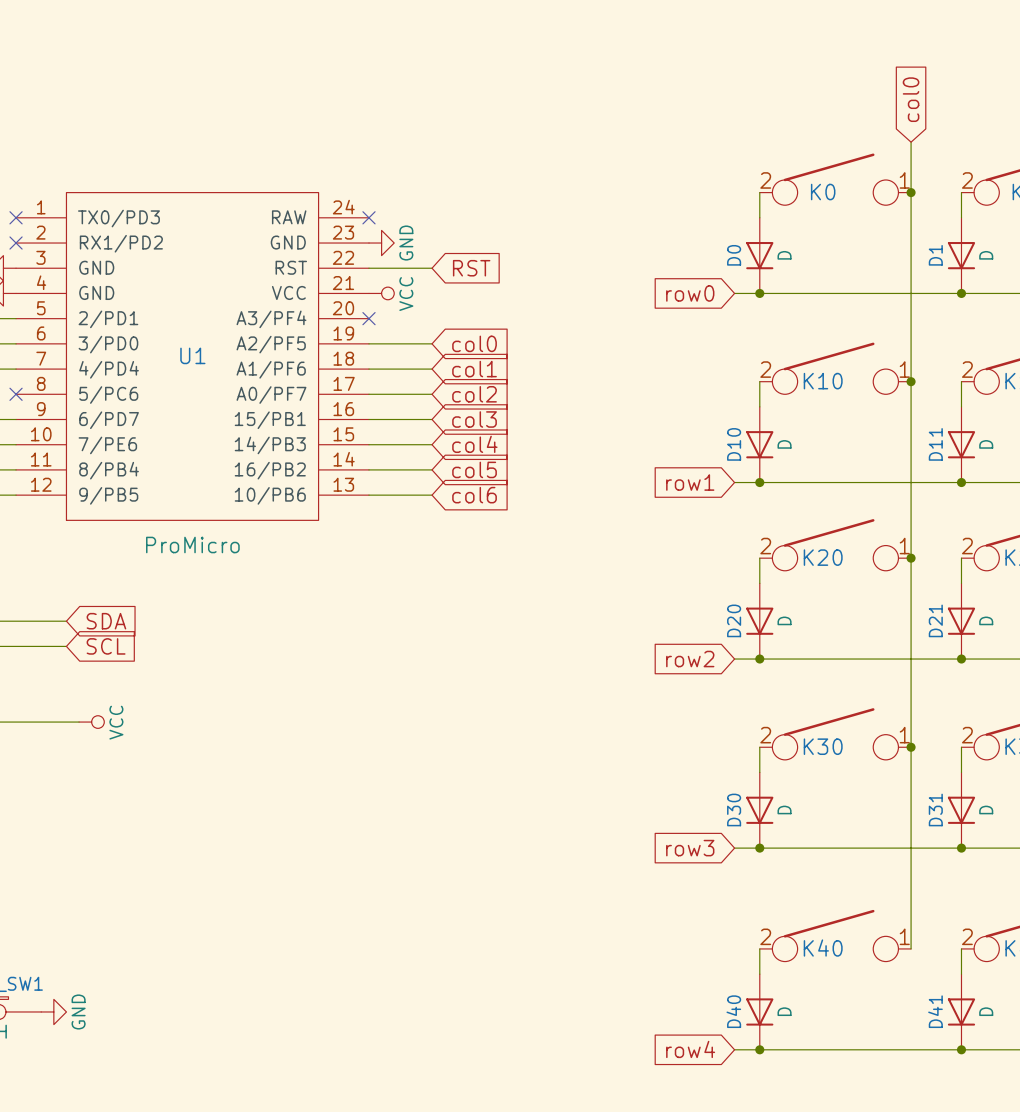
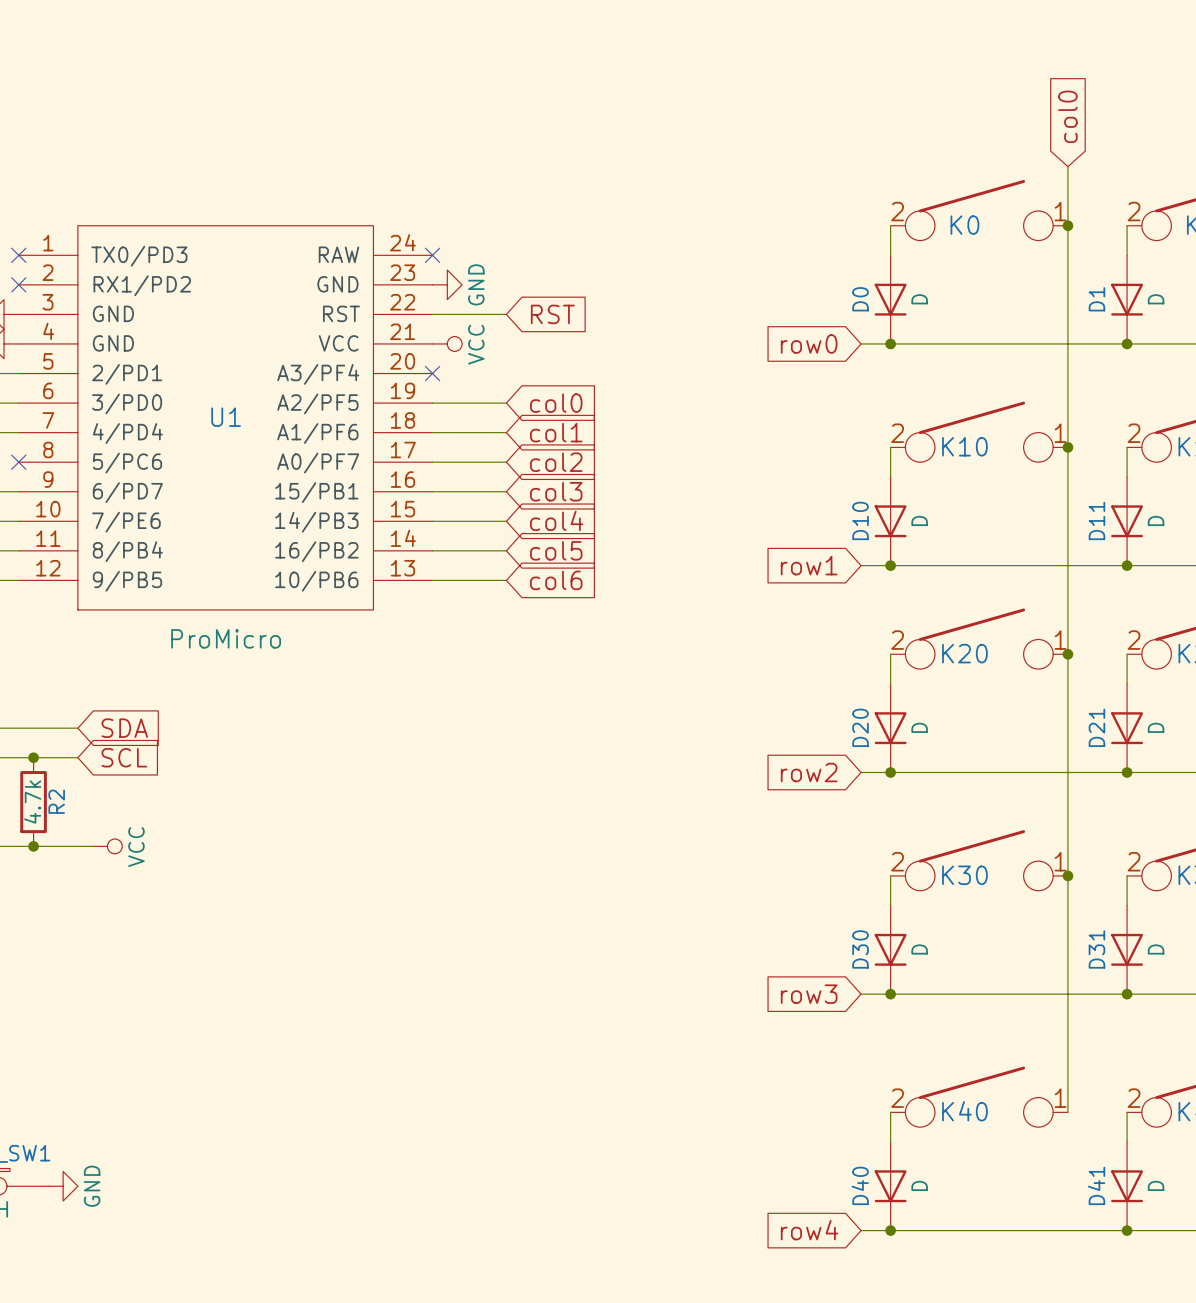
junction: none -> (33, 757)
R2: none -> 4.7k (33, 802)
junction: none -> (33, 846)

